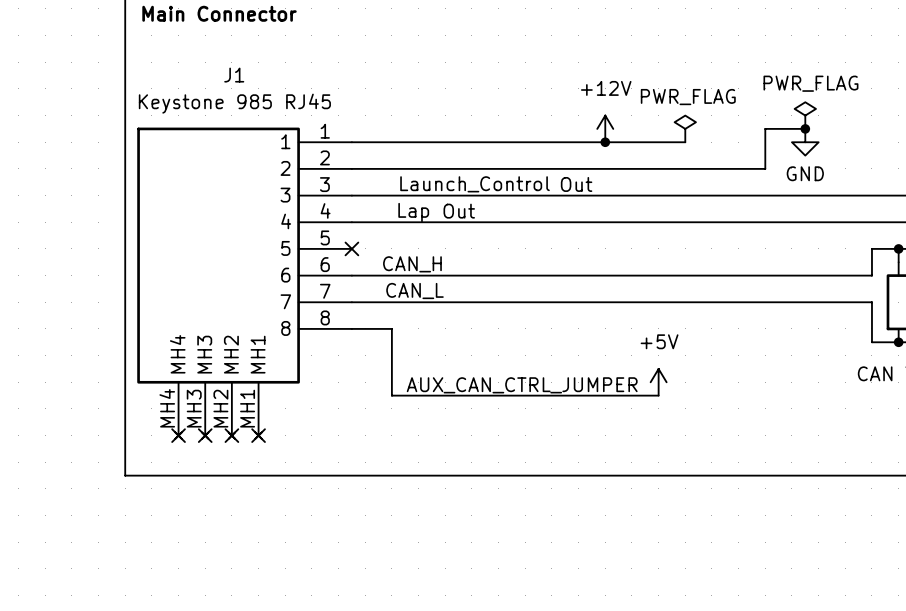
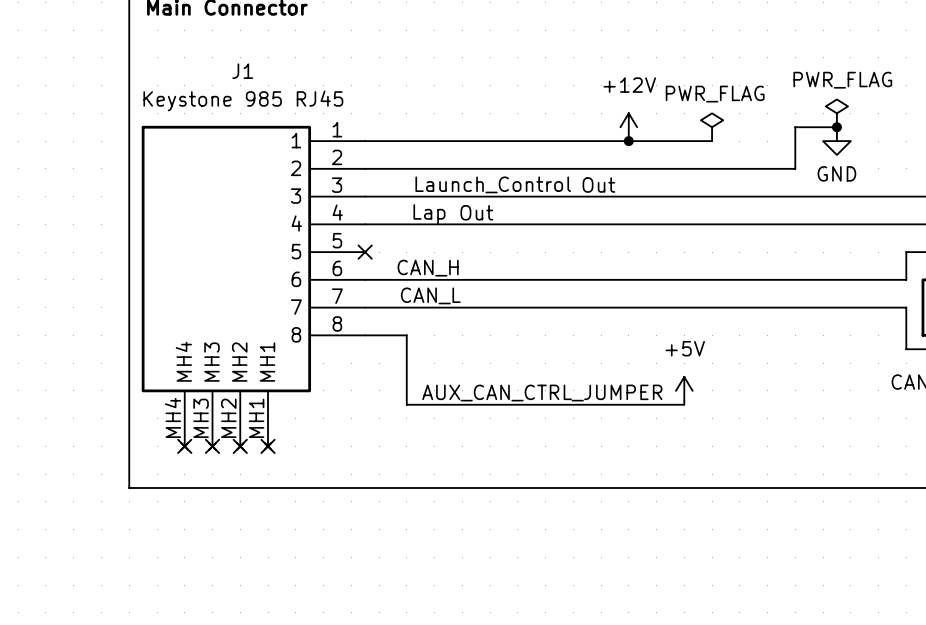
label: none -> AUX_CAN_CTRL_JUMPER (542, 393)
text: AUX_CAN_CTRL_JUMPER (522, 385) -> none

